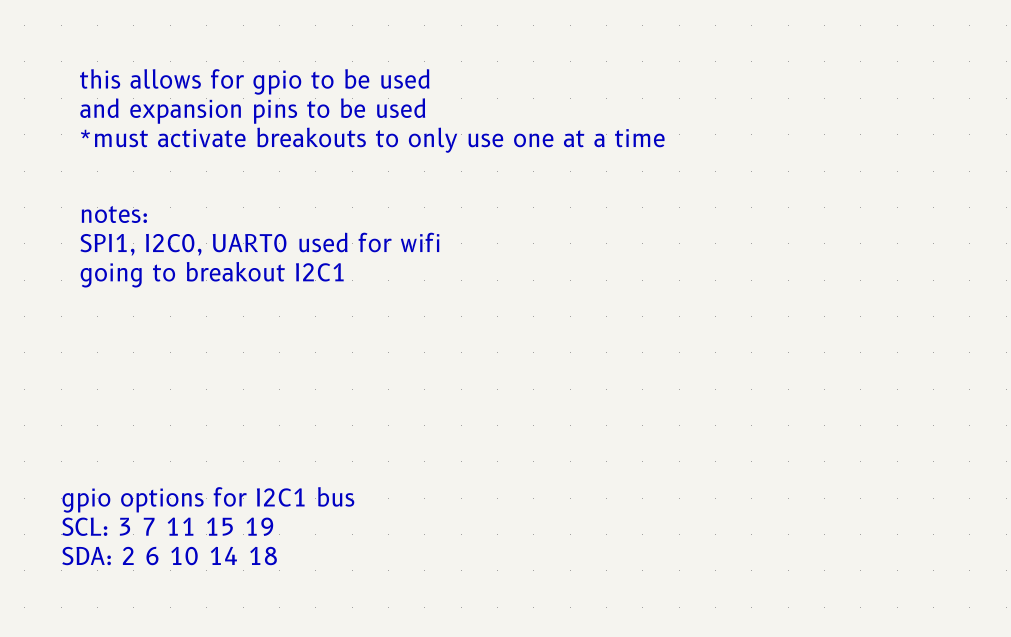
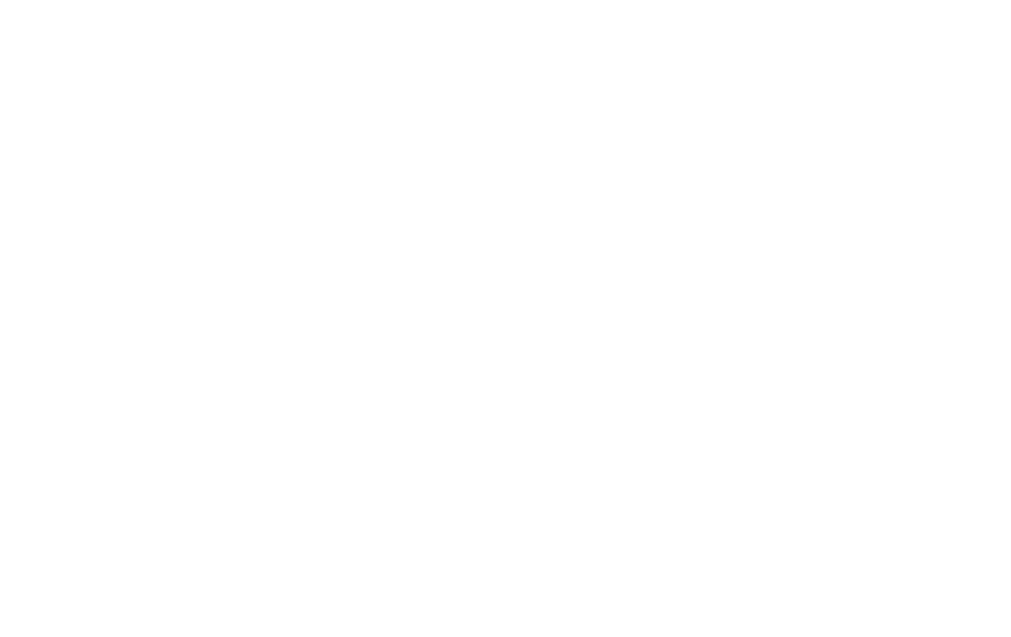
text: this allows for gpio to be used (254, 81) -> none
text: and expansion pins to be used (252, 111) -> none
text: *must activate breakouts to only use one at a time (372, 140) -> none
text: notes: (114, 214) -> none
text: SPI1, I2C0, UART0 used for wifi (259, 244) -> none
text: going to breakout I2C1 (212, 274) -> none
text: gpio options for I2C1 bus (208, 499) -> none
text: SCL: 3 7 11 15 19 (167, 526) -> none
text: SDA: 2 6 10 14 18 (169, 556) -> none

